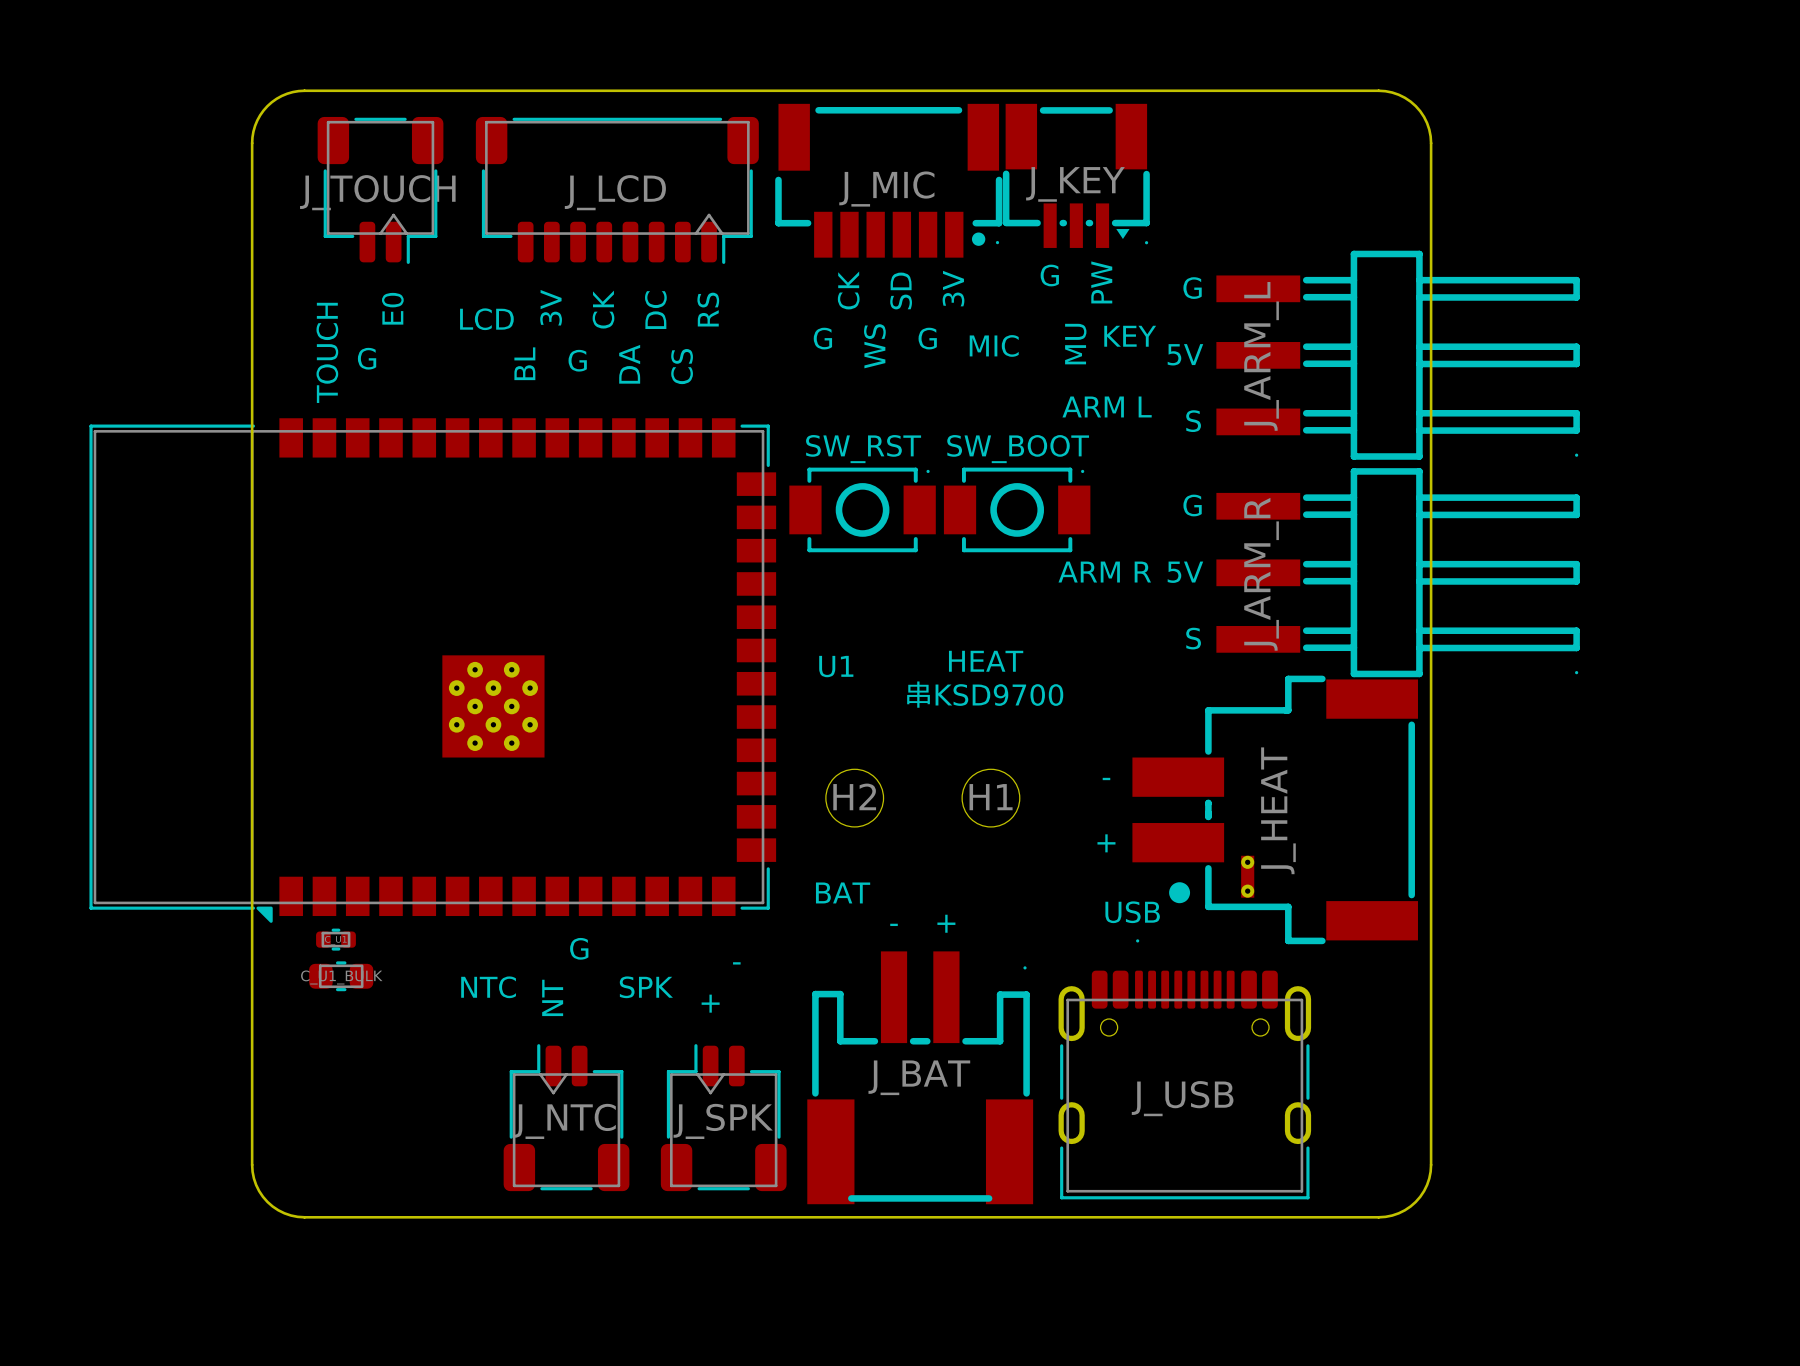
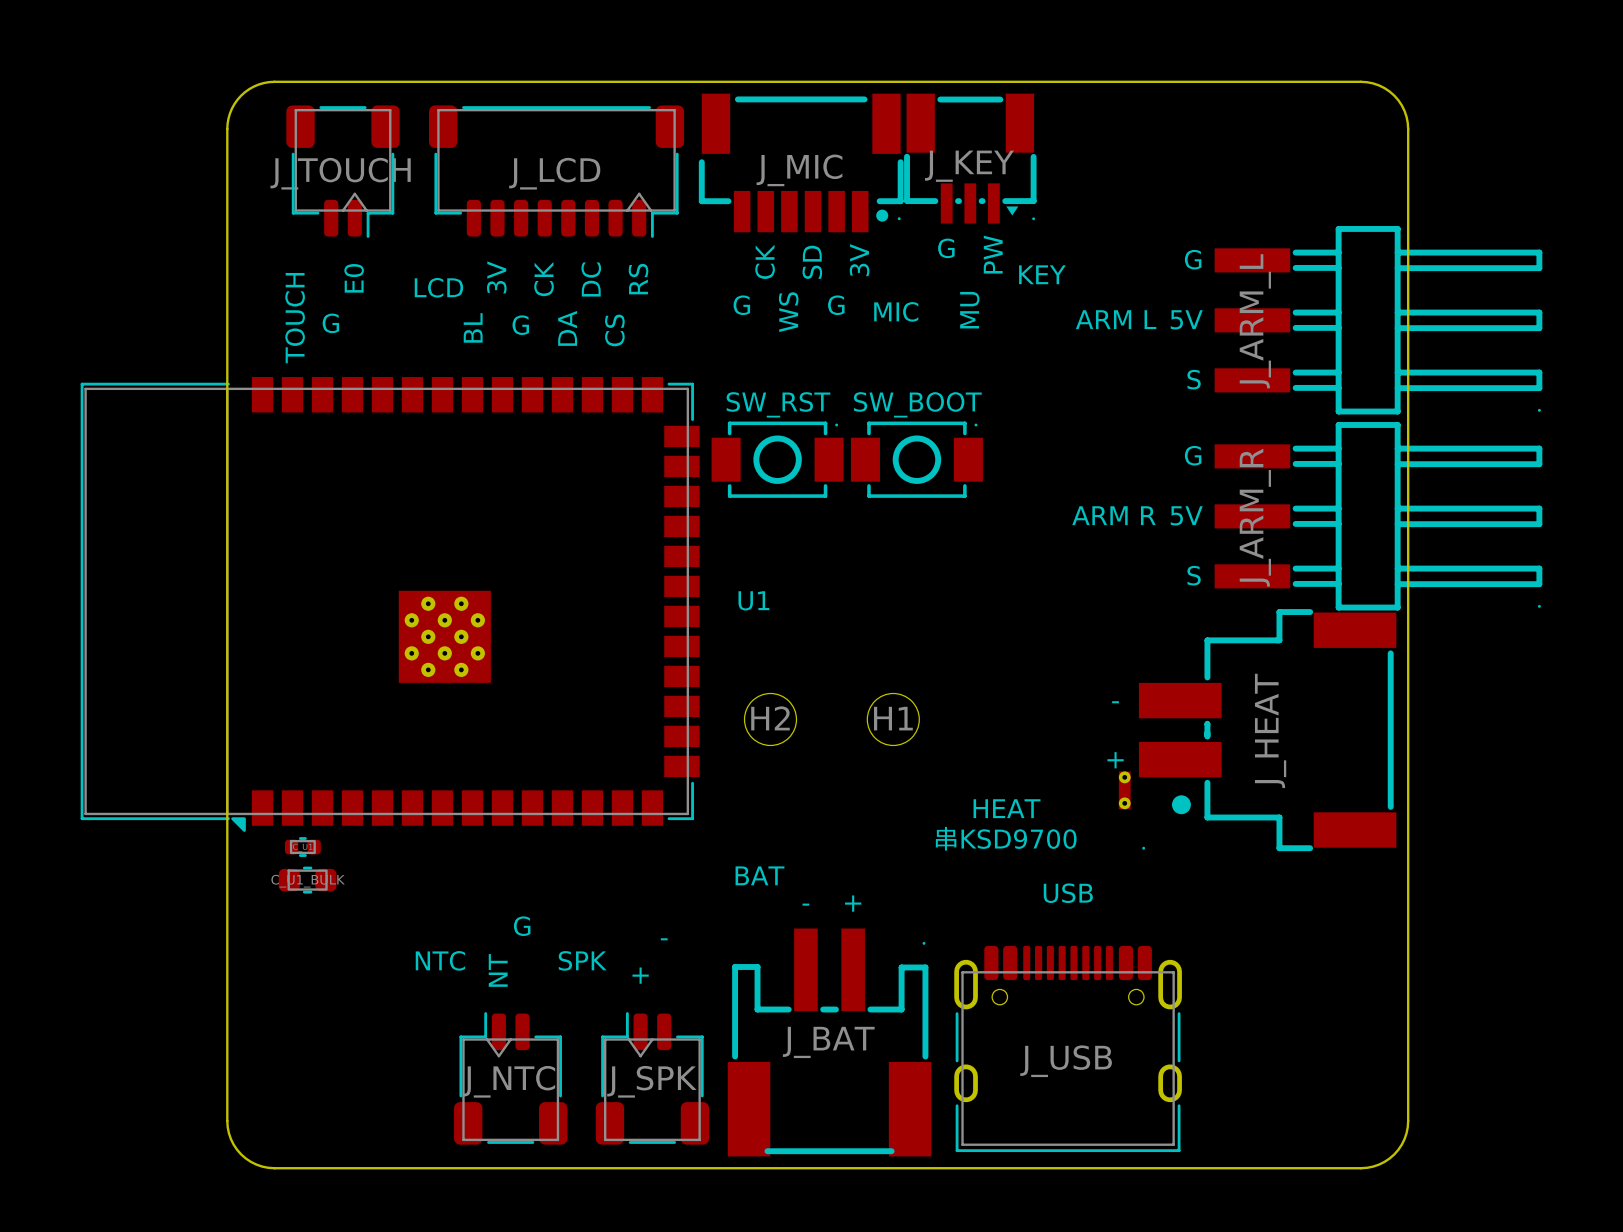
board edge: (1378, 90) (1398, 94) (1415, 106) (1427, 123) (1431, 143) (1431, 1164) (1427, 1184) (1415, 1201) (1398, 1213) (1378, 1217) (304, 1217) (284, 1213) (267, 1201) (256, 1184) (252, 1164) -> (1242, 81) (1373, 83) (1384, 88) (1394, 95) (1401, 105) (1407, 122) (1408, 1120) (1404, 1139) (1394, 1154) (1379, 1164) (1360, 1168) (268, 1167) (256, 1164) (245, 1158) (237, 1149) (230, 1139) (227, 1120) (227, 1050)
text: G (1192, 288) -> none
text: none -> G (1193, 259)
text position: KEY (1130, 336) -> KEY (1042, 274)
text: 5V (1185, 354) -> none
text: none -> 5V (1186, 319)
J_ARM_L position: (1398, 355) -> (1378, 320)
text position: ARM L (1107, 406) -> ARM L (1116, 319)
text: S (1193, 421) -> none
text: none -> S (1194, 379)
text: G (1192, 505) -> none
text: none -> G (1193, 455)
text position: ARM R (1104, 572) -> ARM R (1113, 515)
text: 5V (1185, 572) -> none
text: none -> 5V (1186, 515)
J_ARM_R position: (1398, 572) -> (1378, 516)
text: S (1193, 638) -> none
text: none -> S (1194, 575)
text position: HEAT (986, 661) -> HEAT (1007, 808)
text position: 串KSD9700 (985, 694) -> 串KSD9700 (1006, 838)
text position: - (1106, 778) -> - (1115, 702)
J_HEAT position: (1275, 809) -> (1267, 730)
text: + (1106, 843) -> none
text: none -> + (1115, 760)
text position: BAT (843, 892) -> BAT (760, 875)
text position: USB (1132, 912) -> USB (1068, 893)
text position: + (946, 923) -> + (853, 903)
text position: - (894, 924) -> - (805, 904)
text position: G (579, 948) -> G (522, 926)
text position: - (736, 963) -> - (664, 939)
text position: NTC (488, 987) -> NTC (440, 960)
text position: SPK (646, 987) -> SPK (582, 960)
text position: NT (552, 997) -> NT (498, 970)
text position: + (710, 1003) -> + (640, 975)
J_BAT position: (920, 1077) -> (829, 1042)
J_USB position: (1184, 1085) -> (1068, 1048)
J_NTC position: (566, 1117) -> (510, 1078)
J_SPK position: (723, 1117) -> (652, 1078)

